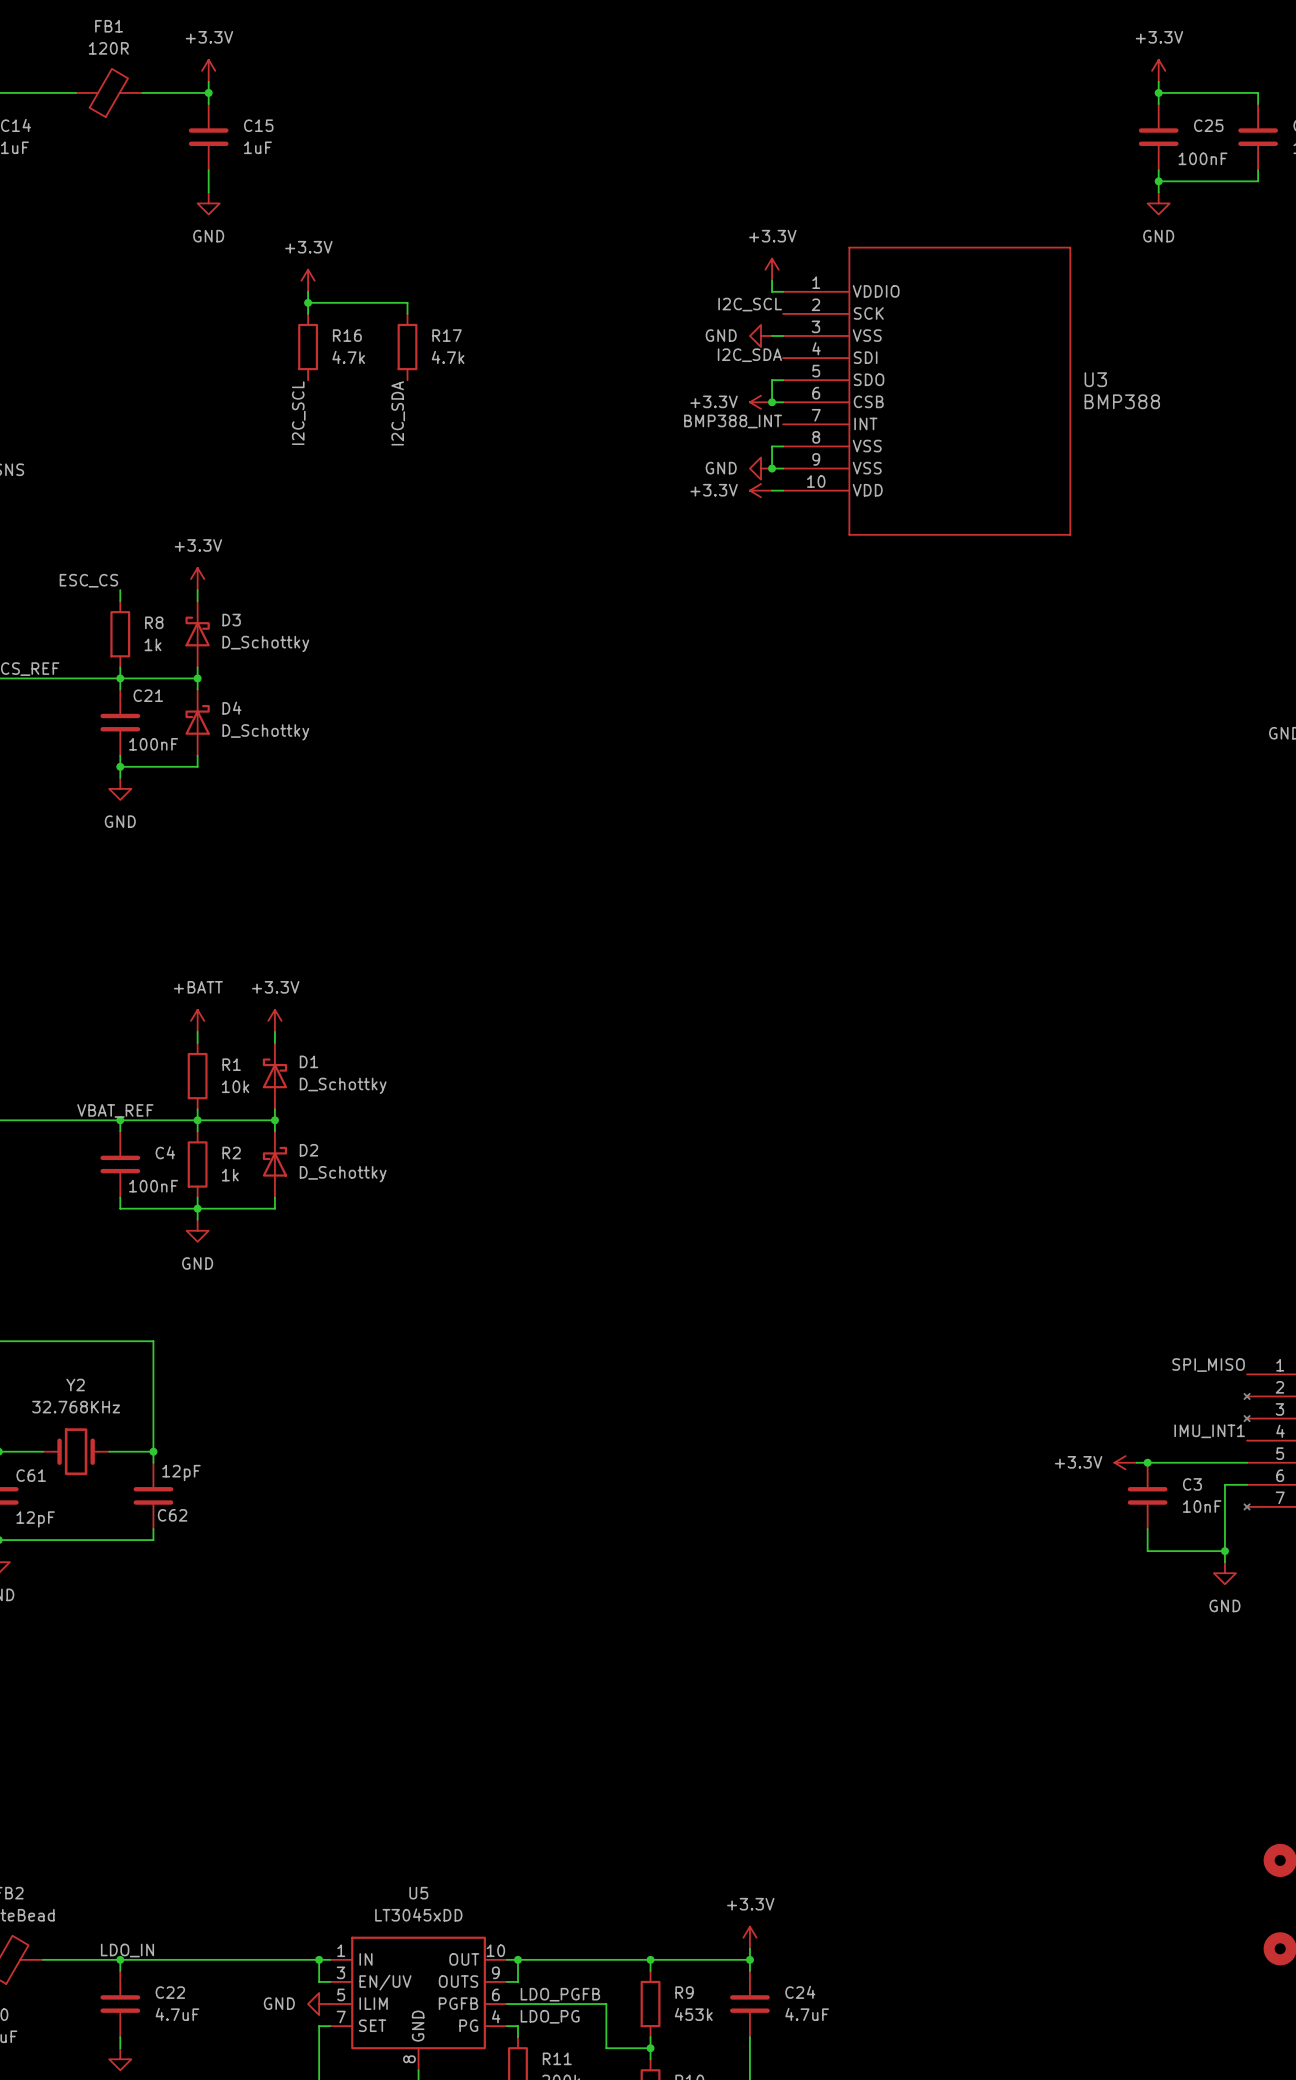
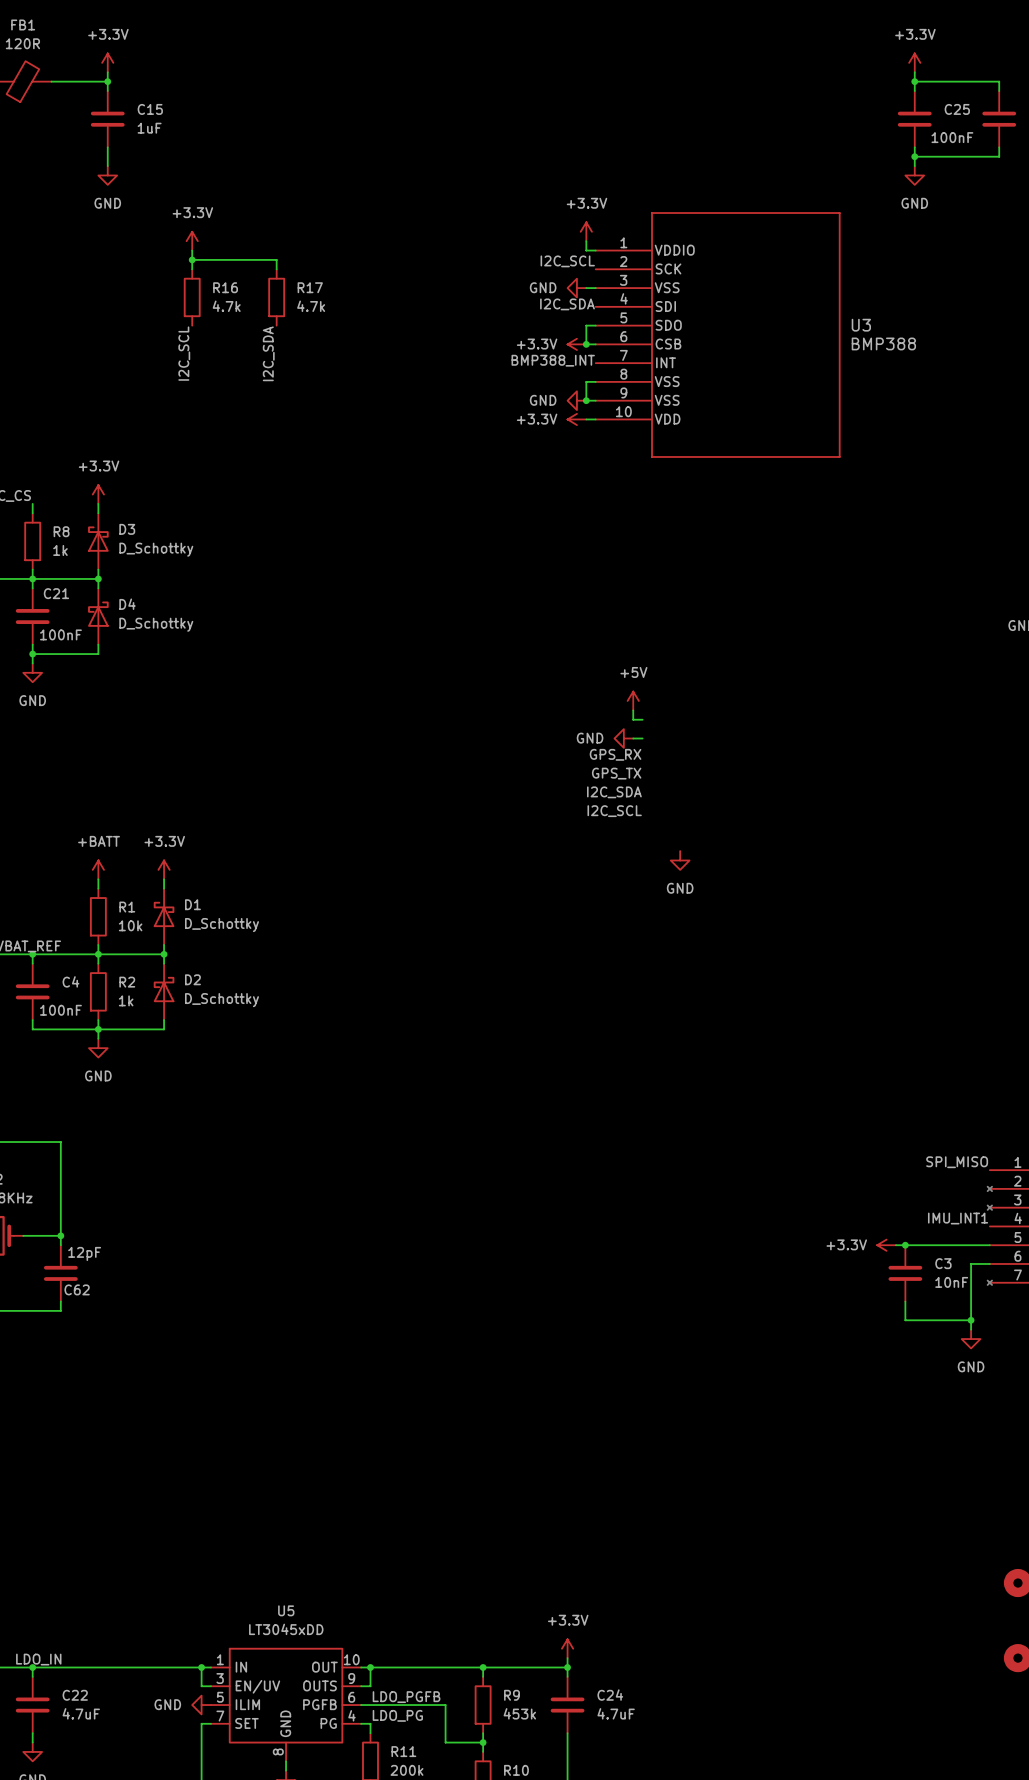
power symbol: none -> +5V (633, 700)
wire: none -> (633, 710) (633, 719) (642, 719)
power symbol: none -> GND (623, 738)
wire: none -> (633, 738) (642, 738)
label: none -> GPS_RX (615, 754)
label: none -> GPS_TX (616, 773)
label: none -> I2C_SDA (614, 792)
label: none -> I2C_SCL (614, 811)
power symbol: none -> GND (680, 860)

